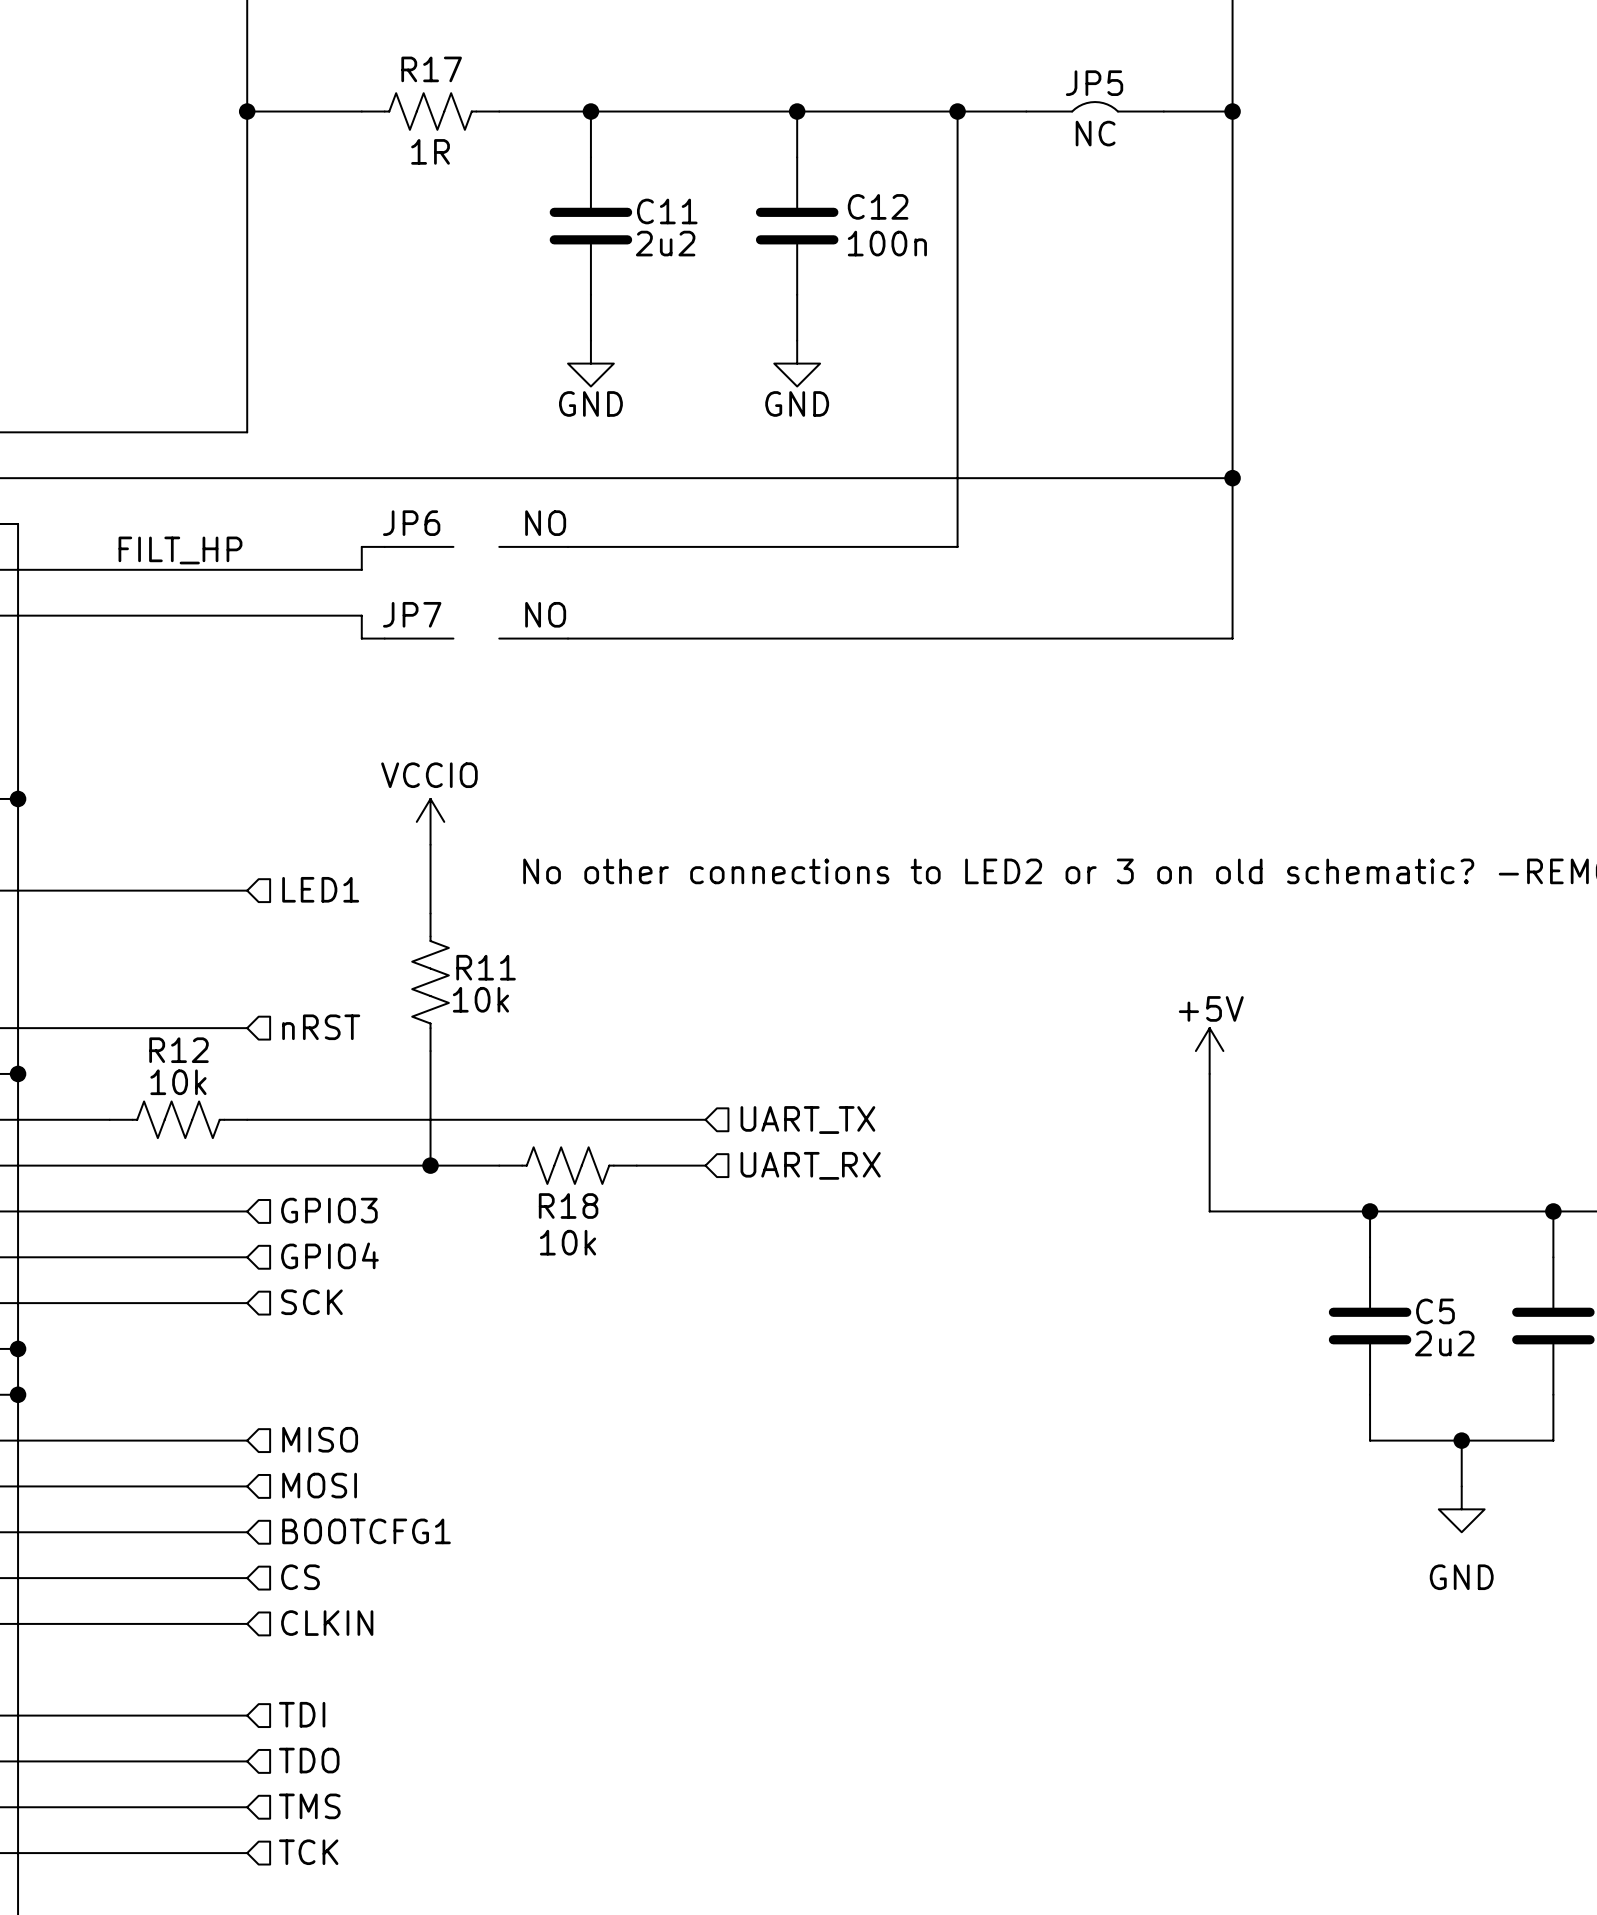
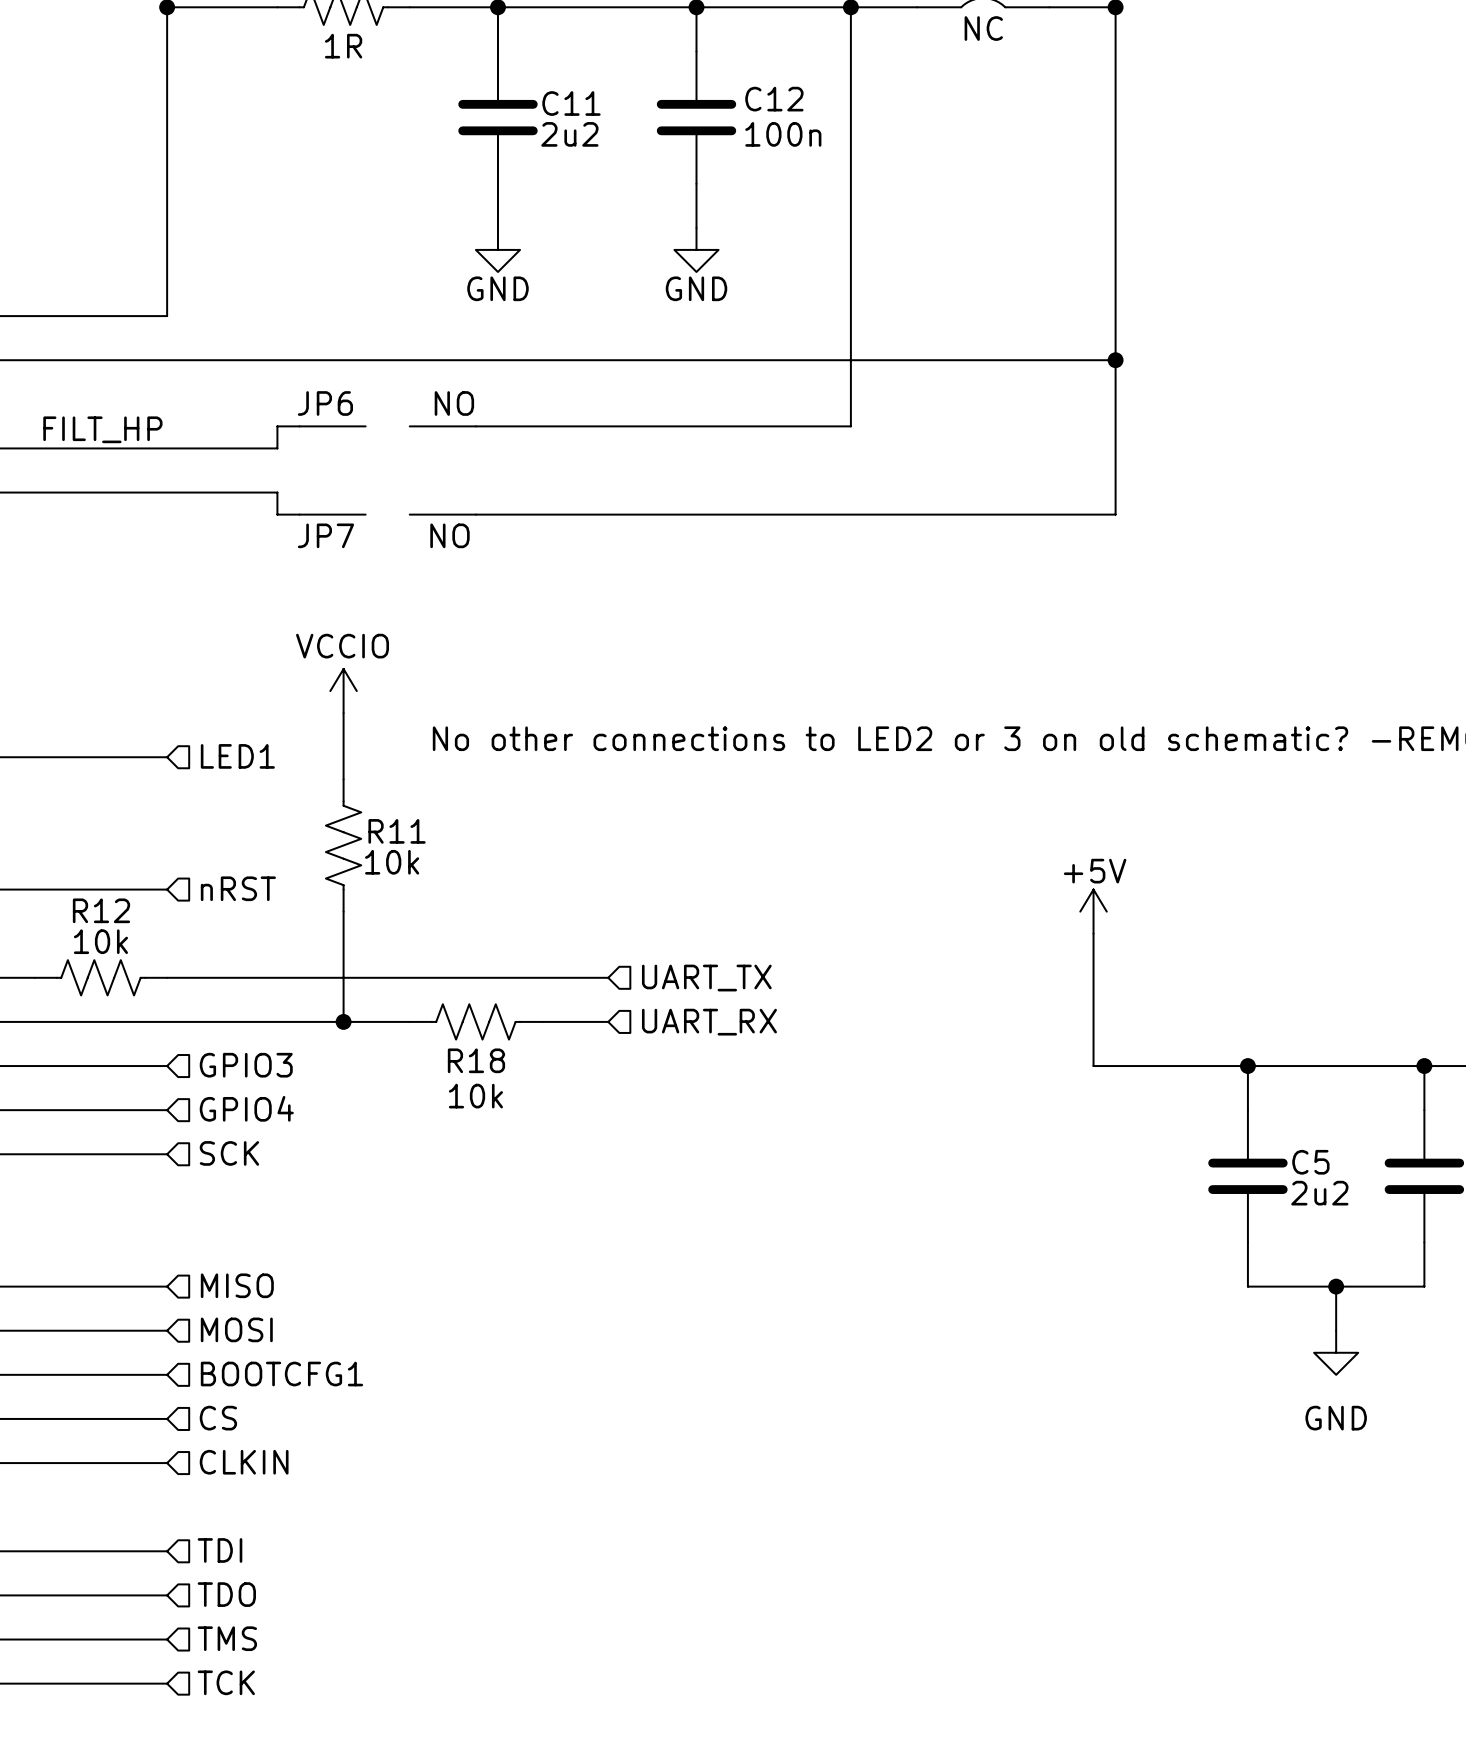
JP7 name position: JP7 (412, 614) -> JP7 (325, 535)
JP7 text position: NO (545, 614) -> NO (449, 535)

